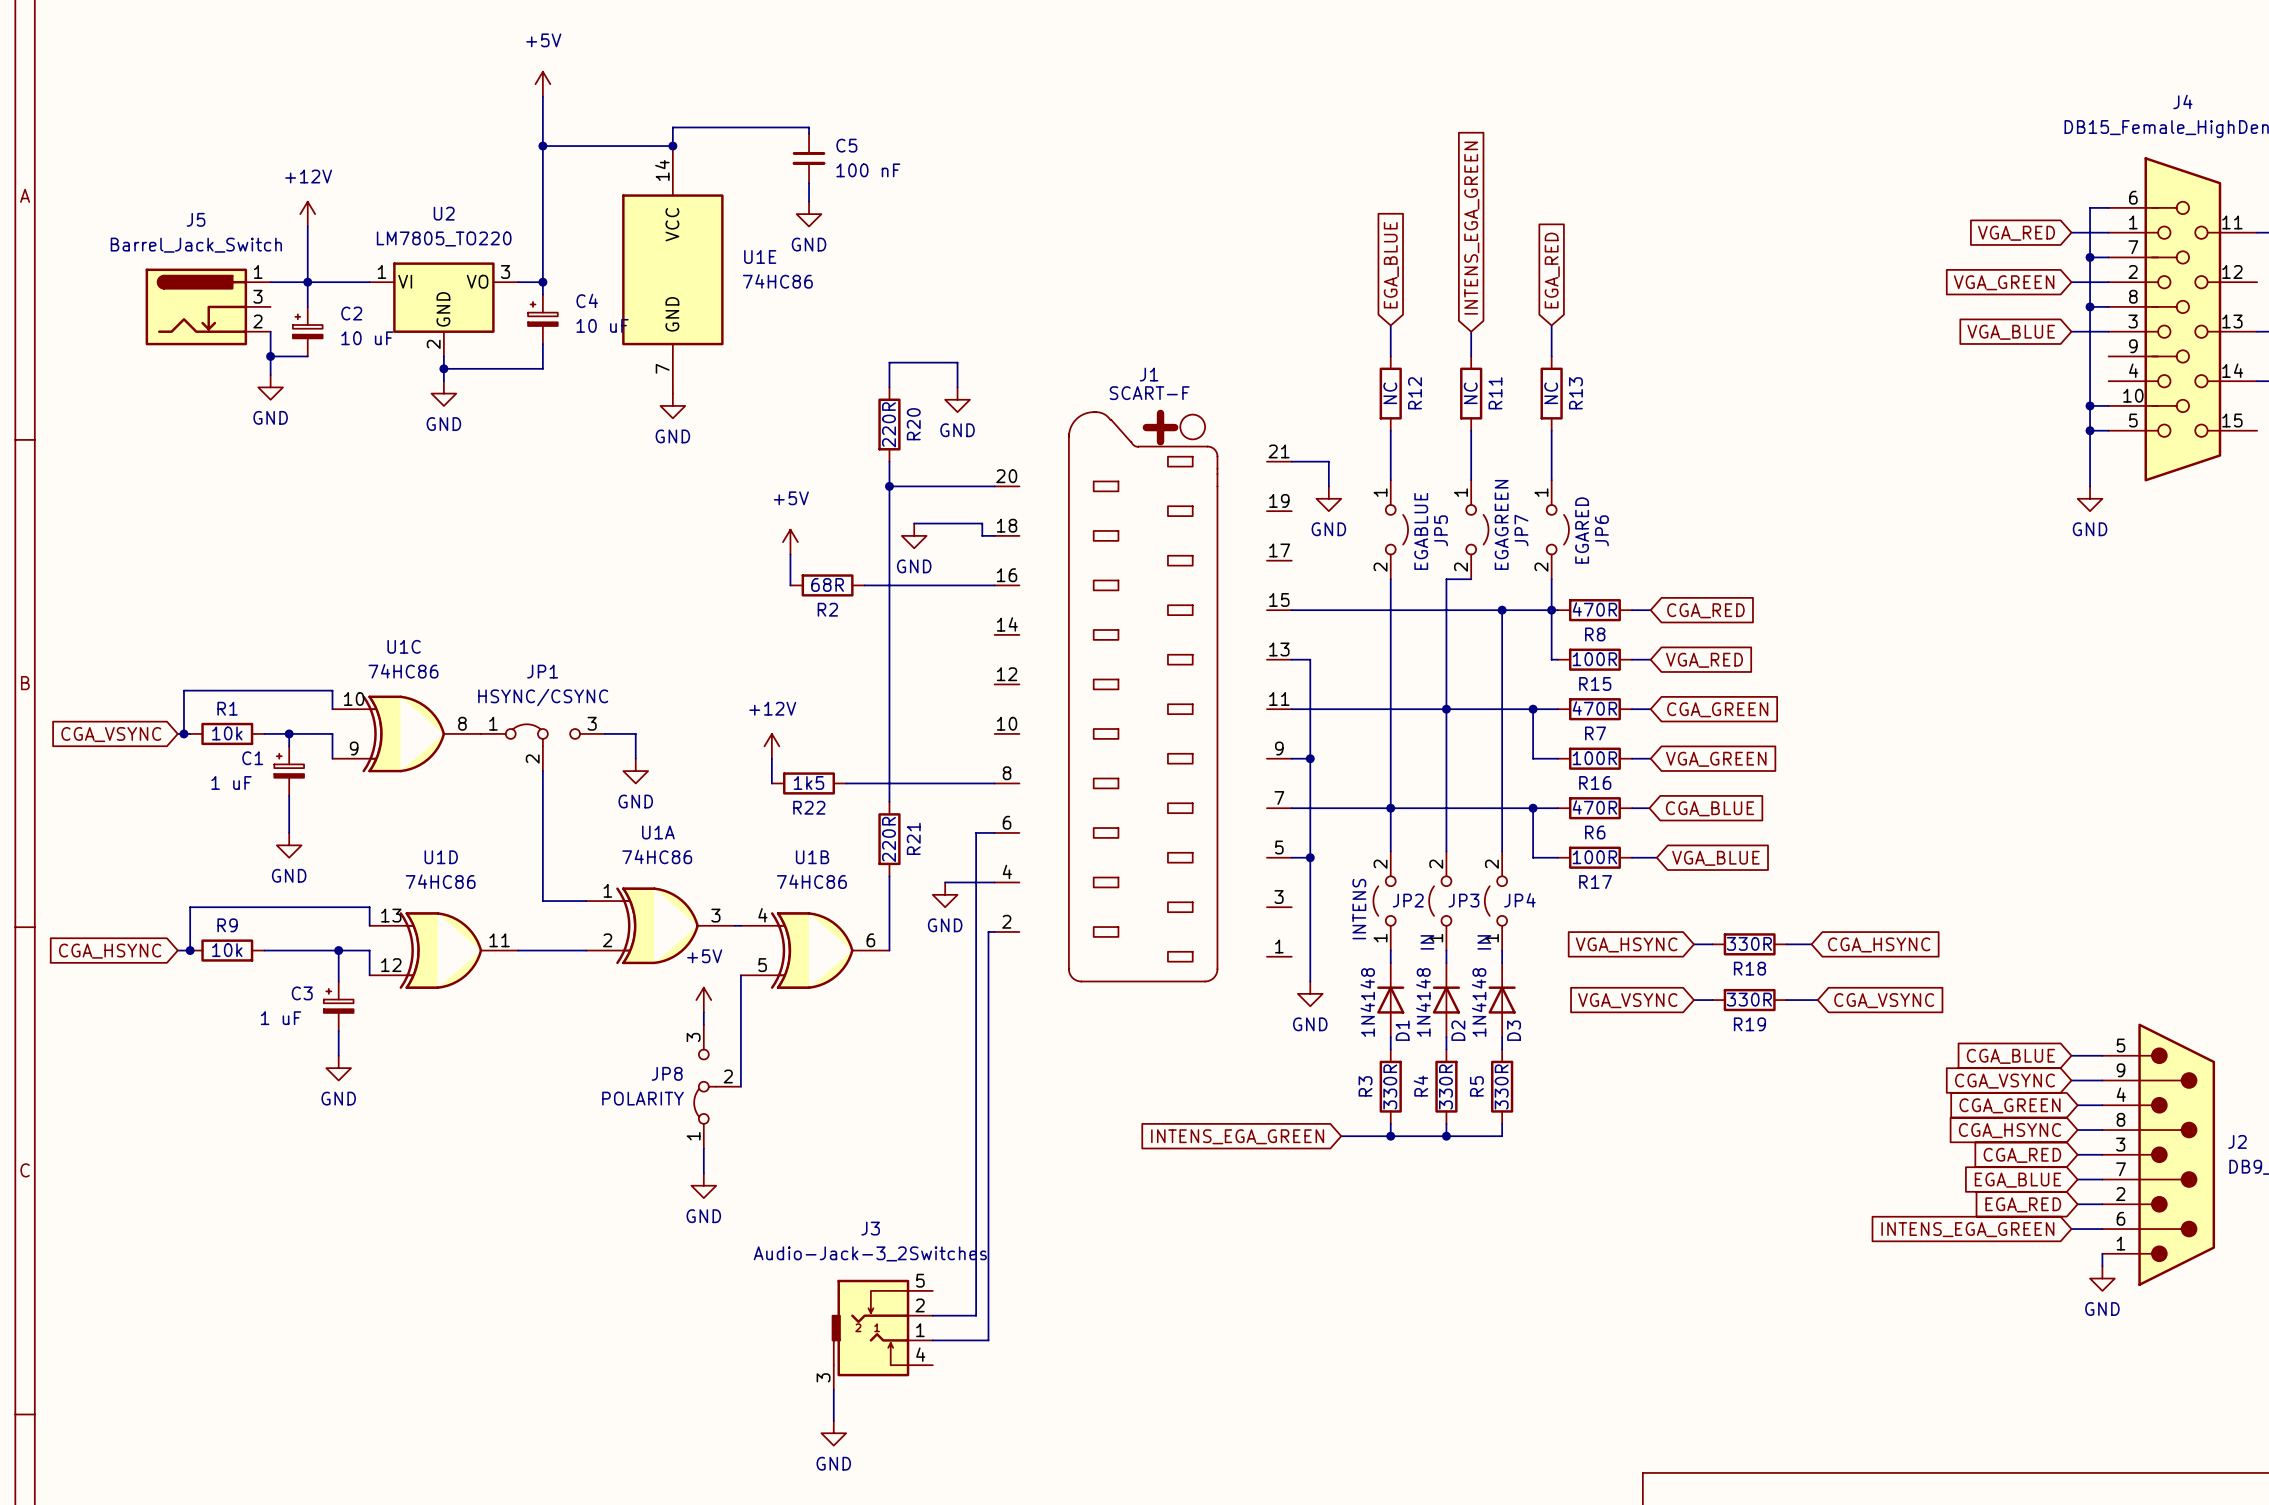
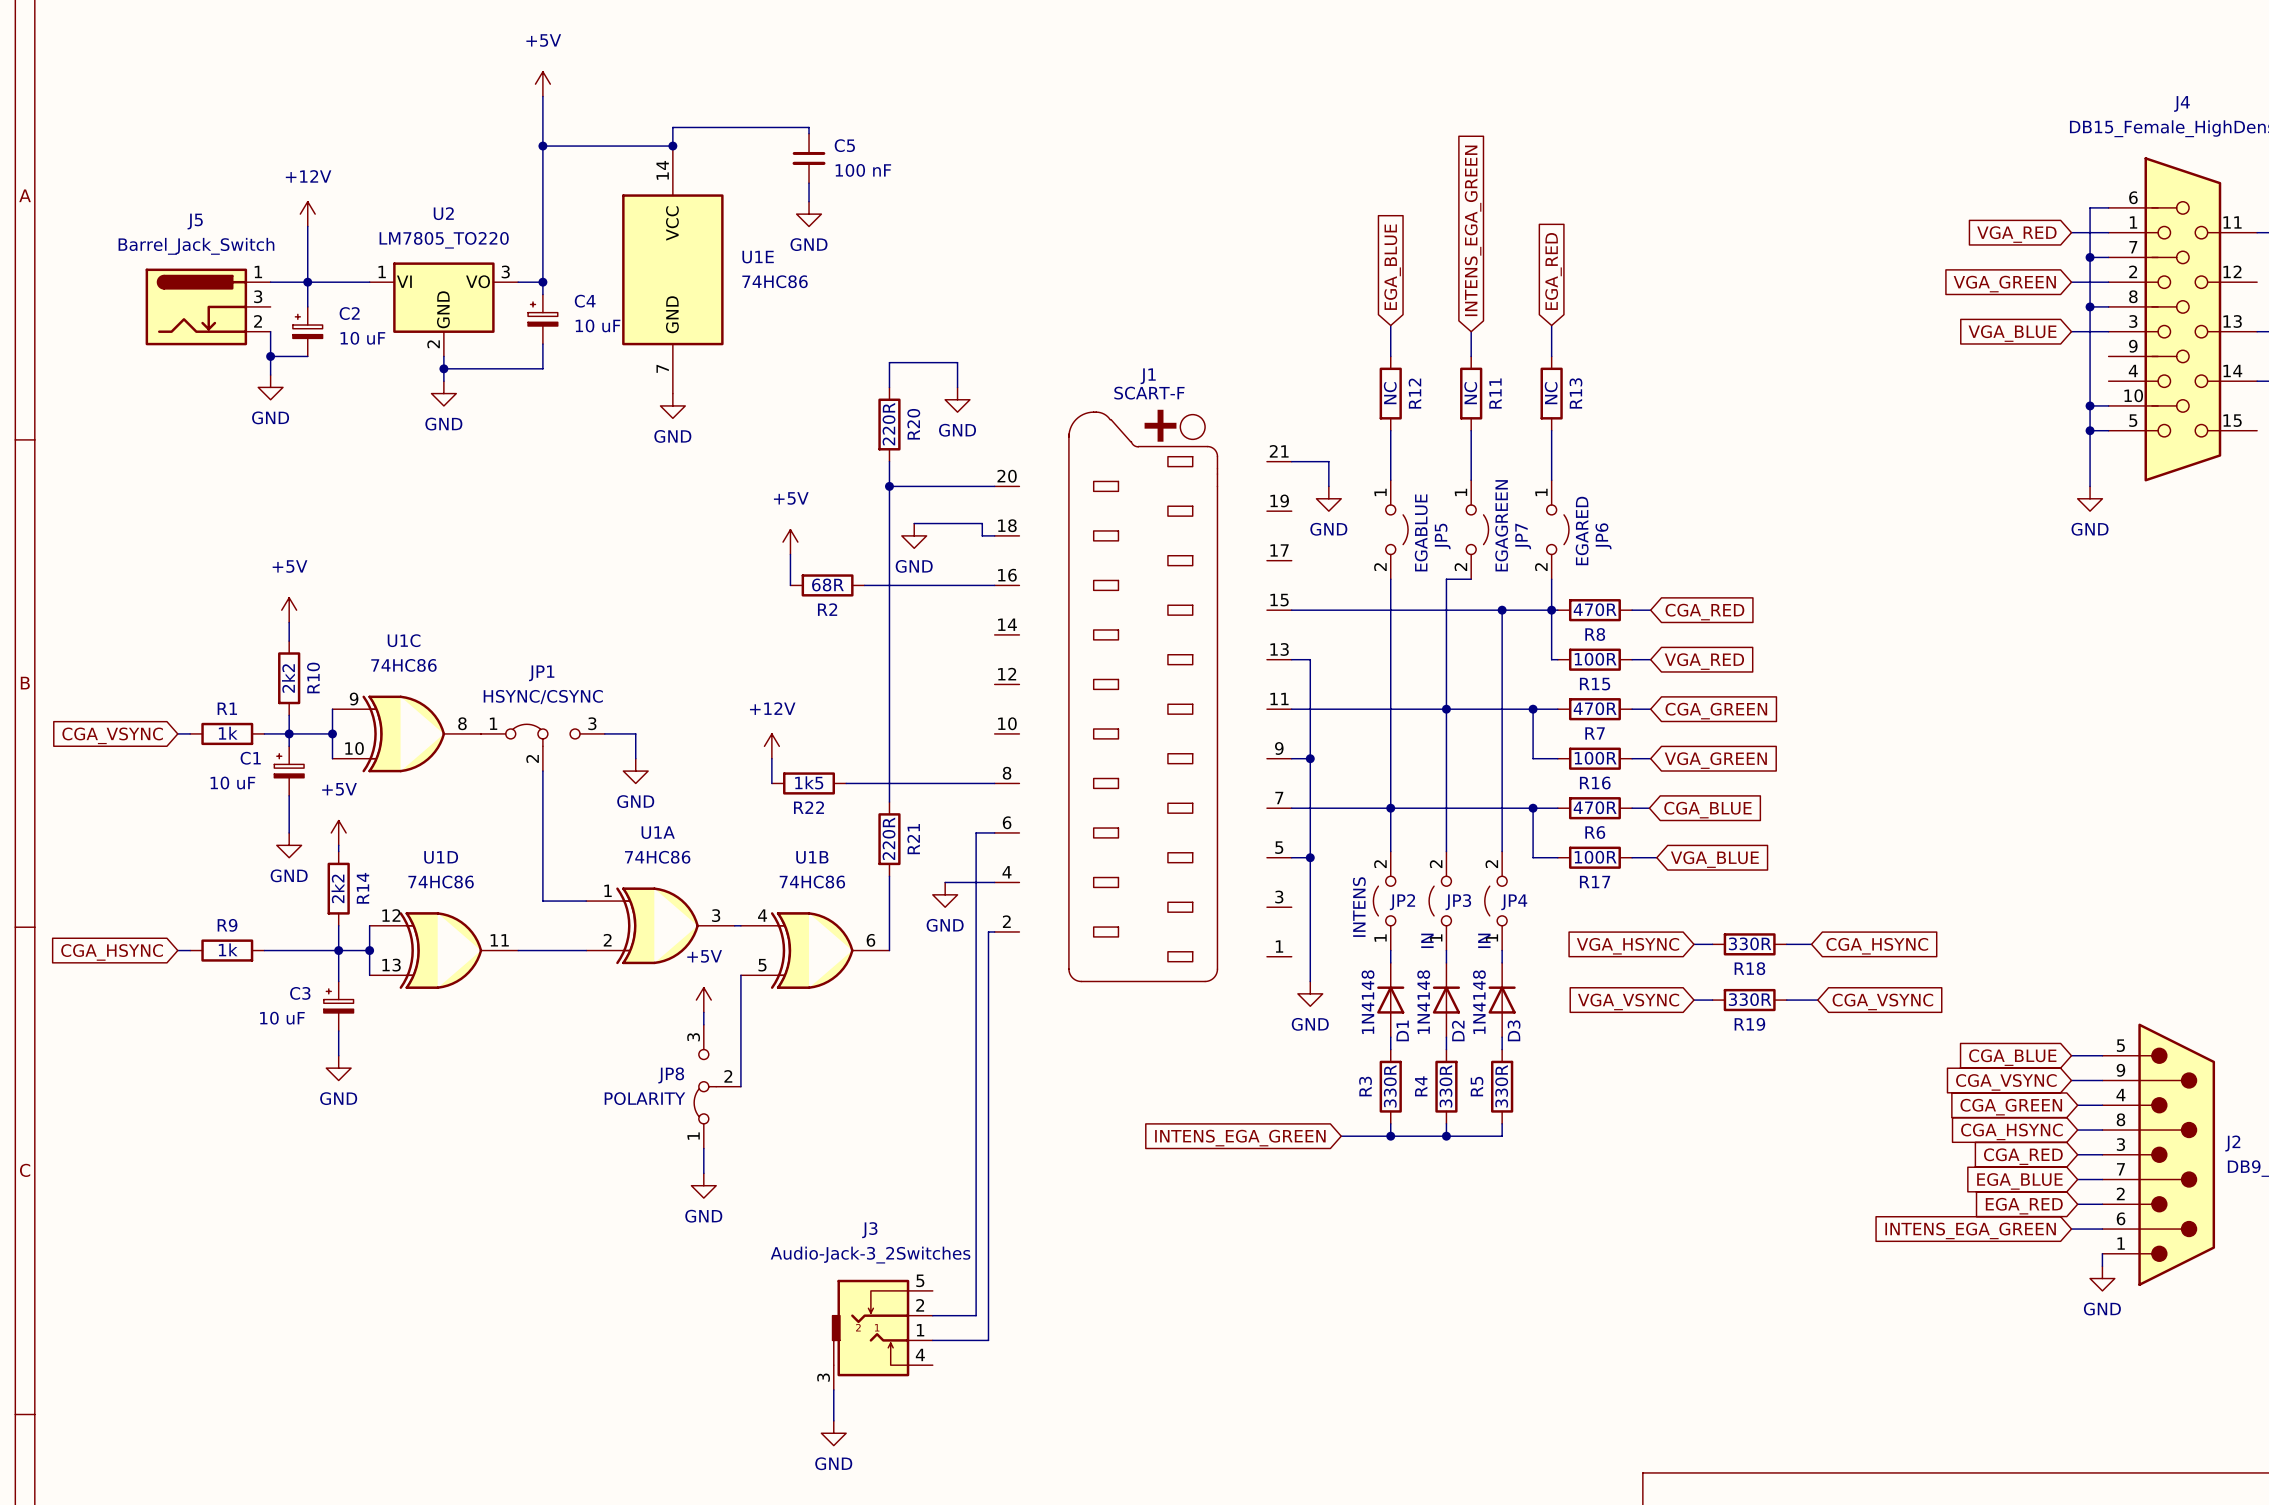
power symbol: none -> +5V (289, 610)
wire: none -> (289, 622) (289, 641)
R10: none -> 2k2 (289, 678)
wire: (332, 709) (332, 690) (183, 690) (183, 733) -> (332, 709) (332, 733)
wire: none -> (289, 715) (289, 733)
junction: (183, 733) -> none
R1 value: 10k (227, 733) -> 1k (228, 733)
junction: none -> (332, 733)
U1C flip: as is (403, 733) -> up-down (403, 733)
C1 value: 1 uF (231, 782) -> 10 uF (232, 783)
power symbol: none -> +5V (338, 832)
wire: none -> (338, 845) (338, 851)
R14: none -> 2k2 (338, 888)
wire: none -> (338, 925) (338, 950)
wire: (369, 925) (369, 907) (190, 907) (190, 950) -> (369, 925) (369, 950)
junction: (190, 950) -> none
R9 value: 10k (227, 950) -> 1k (228, 949)
junction: none -> (369, 950)
U1D flip: as is (440, 950) -> up-down (440, 950)
C3 value: 1 uF (281, 1018) -> 10 uF (282, 1018)

